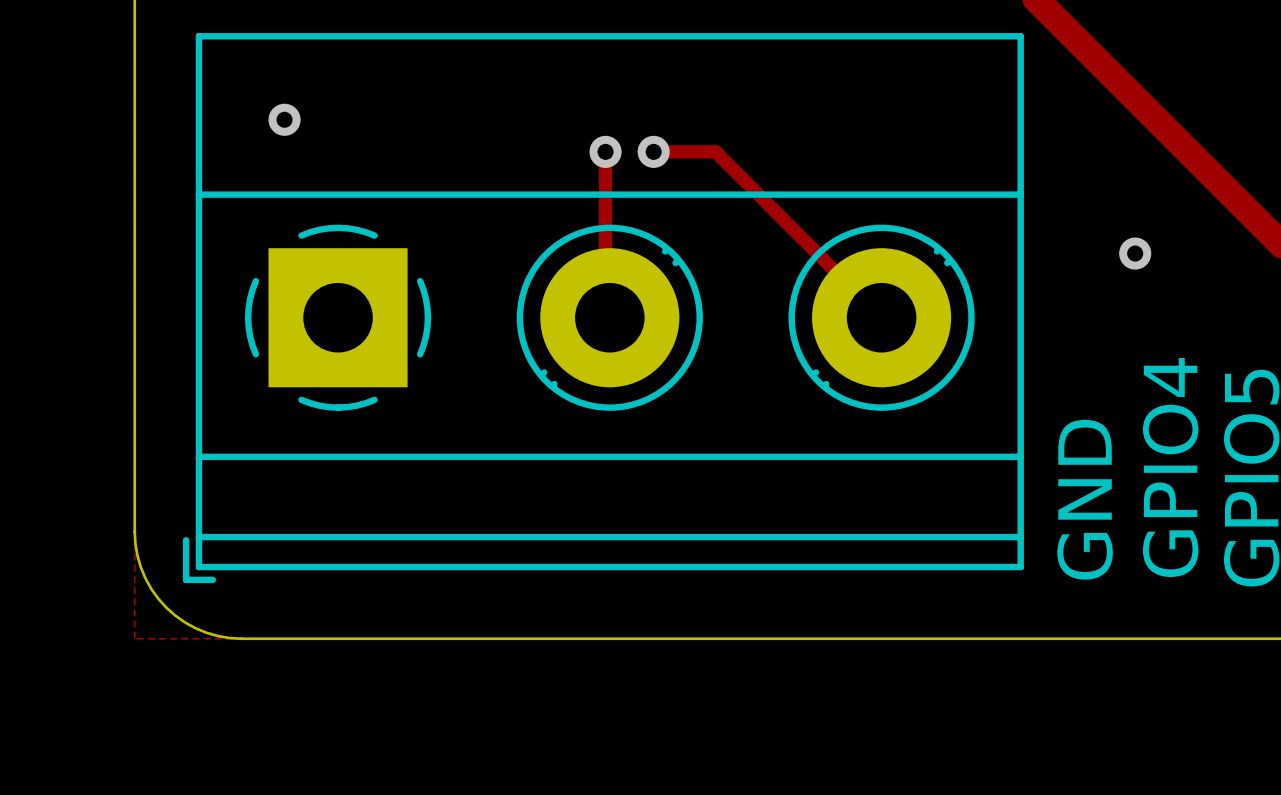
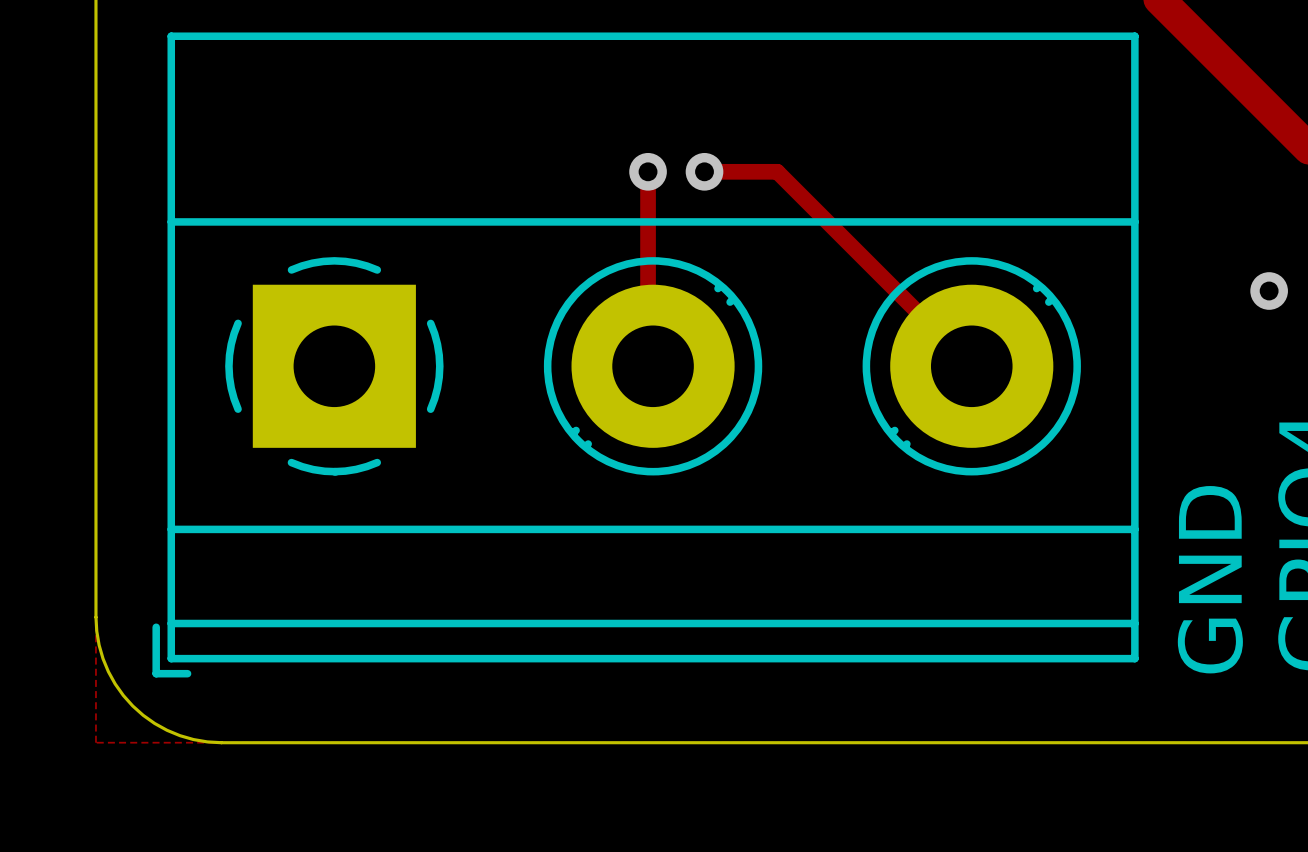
via: (284, 119) -> none

